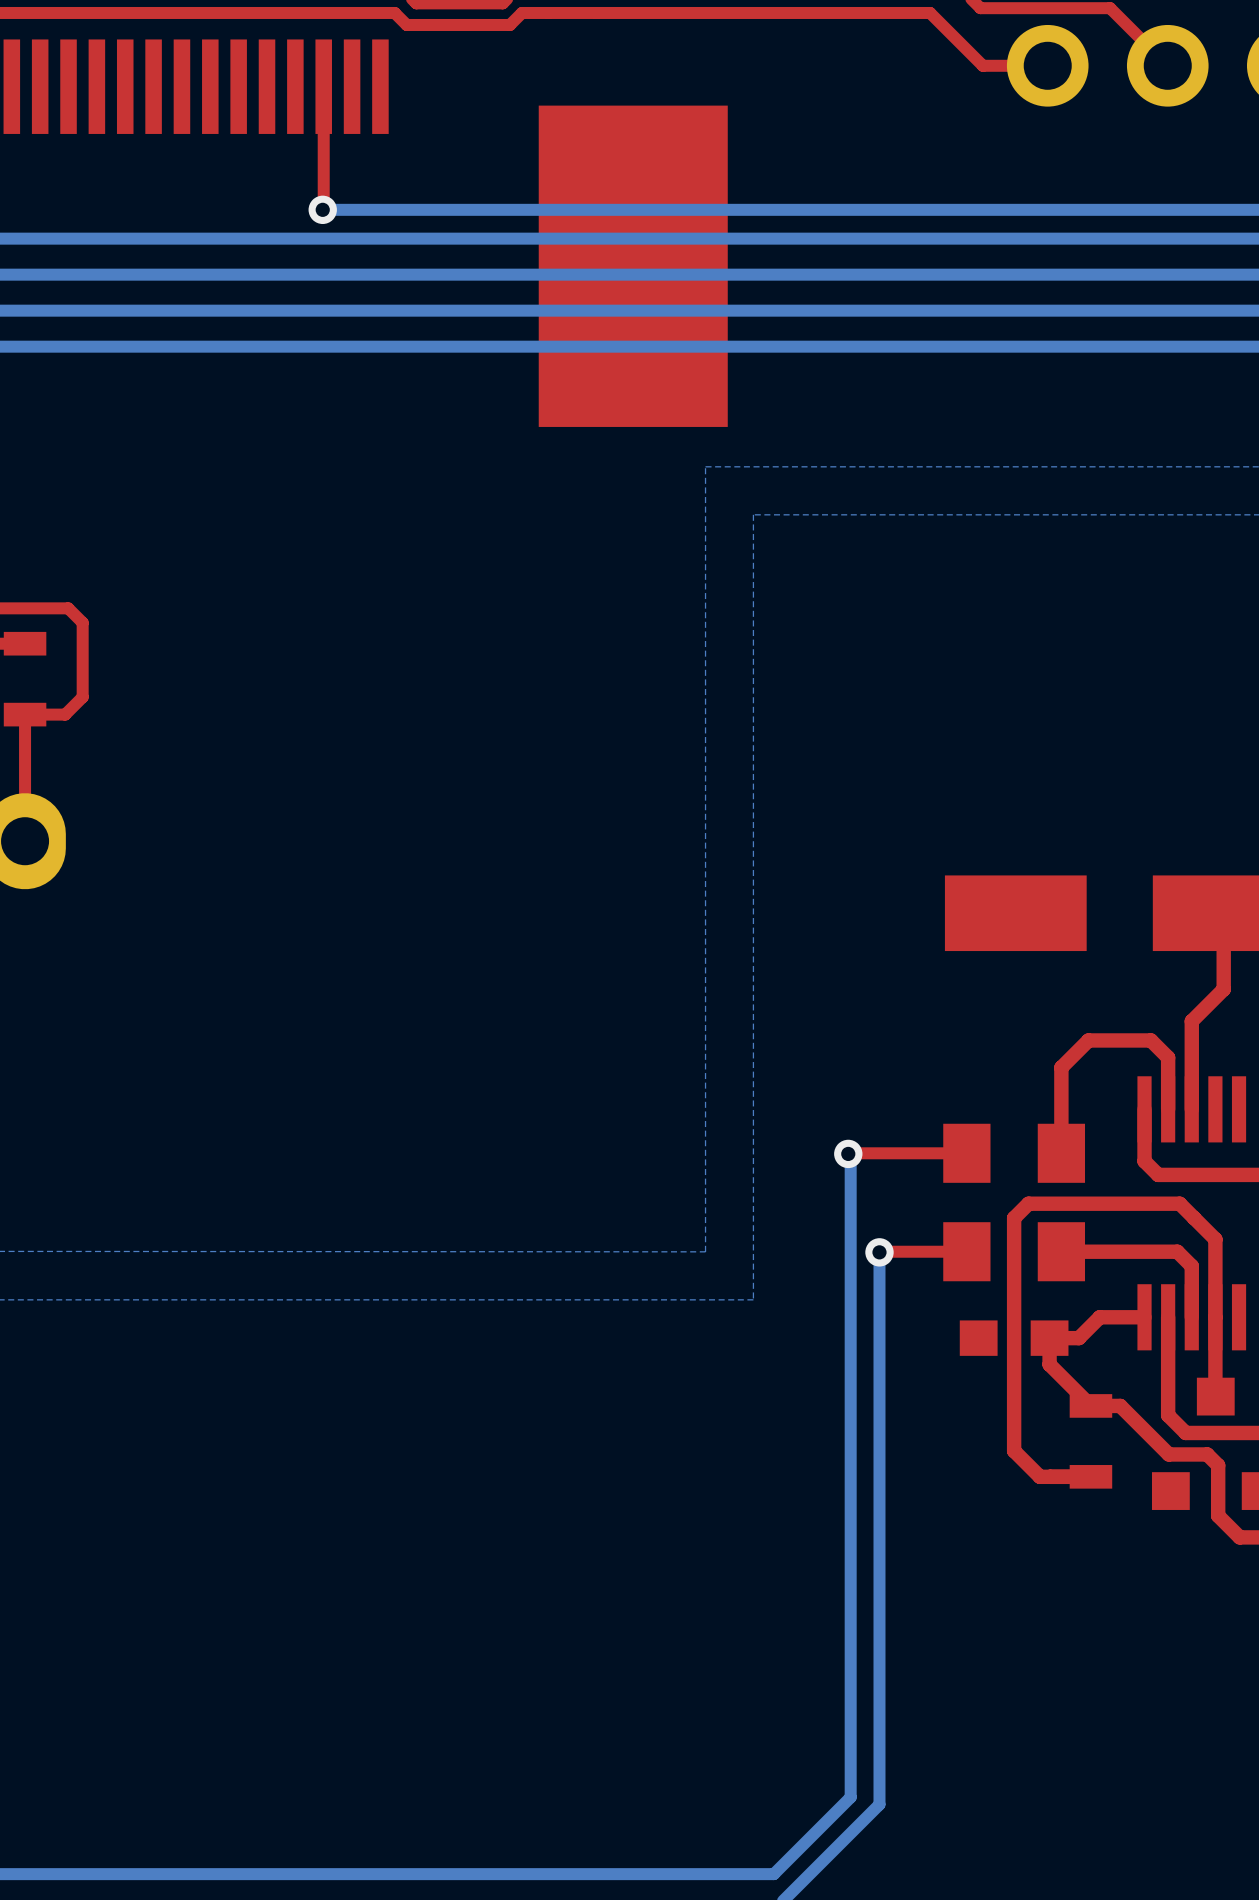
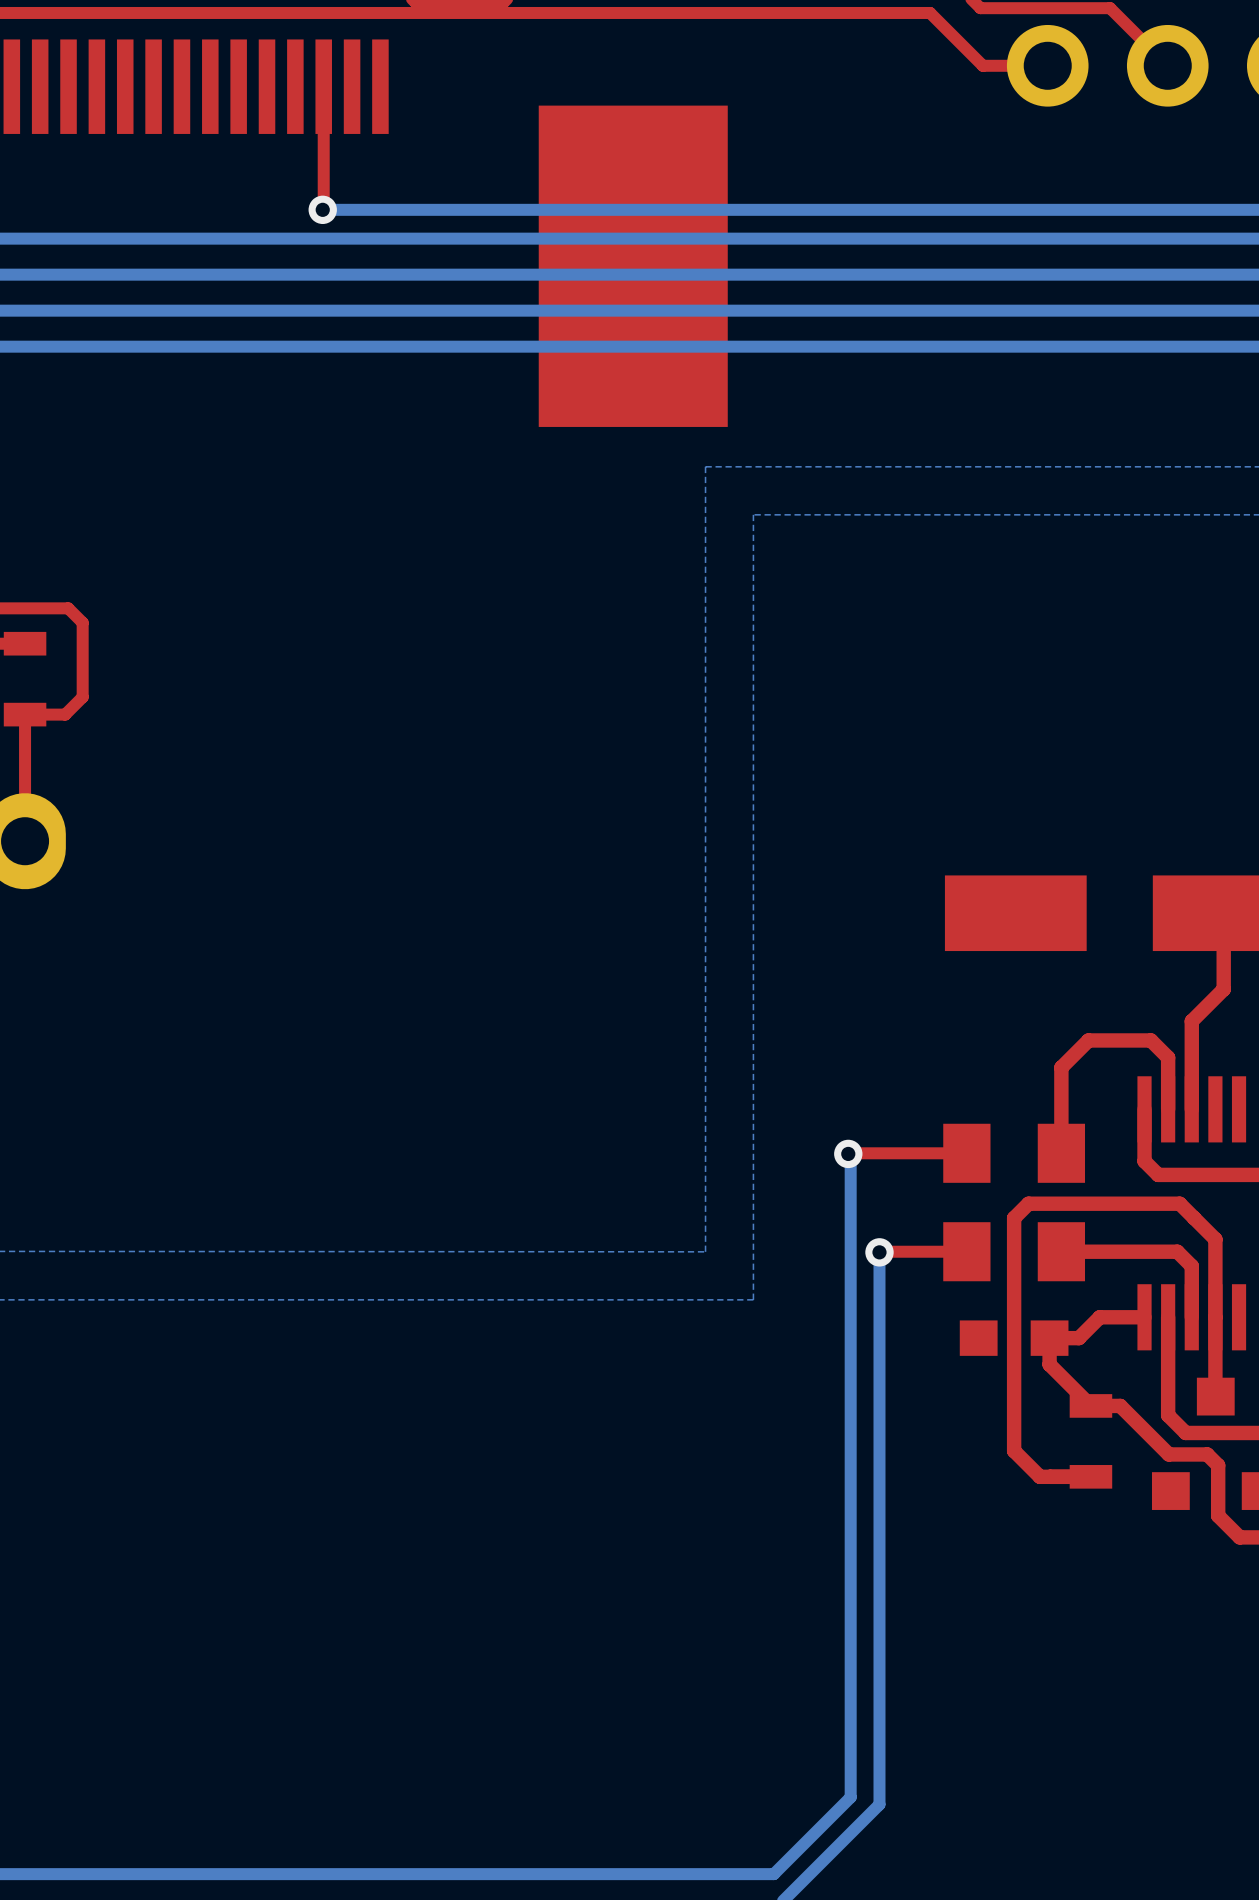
top track: (521, 12) (509, 24) (406, 24) (394, 12) -> (521, 12) (394, 12)

